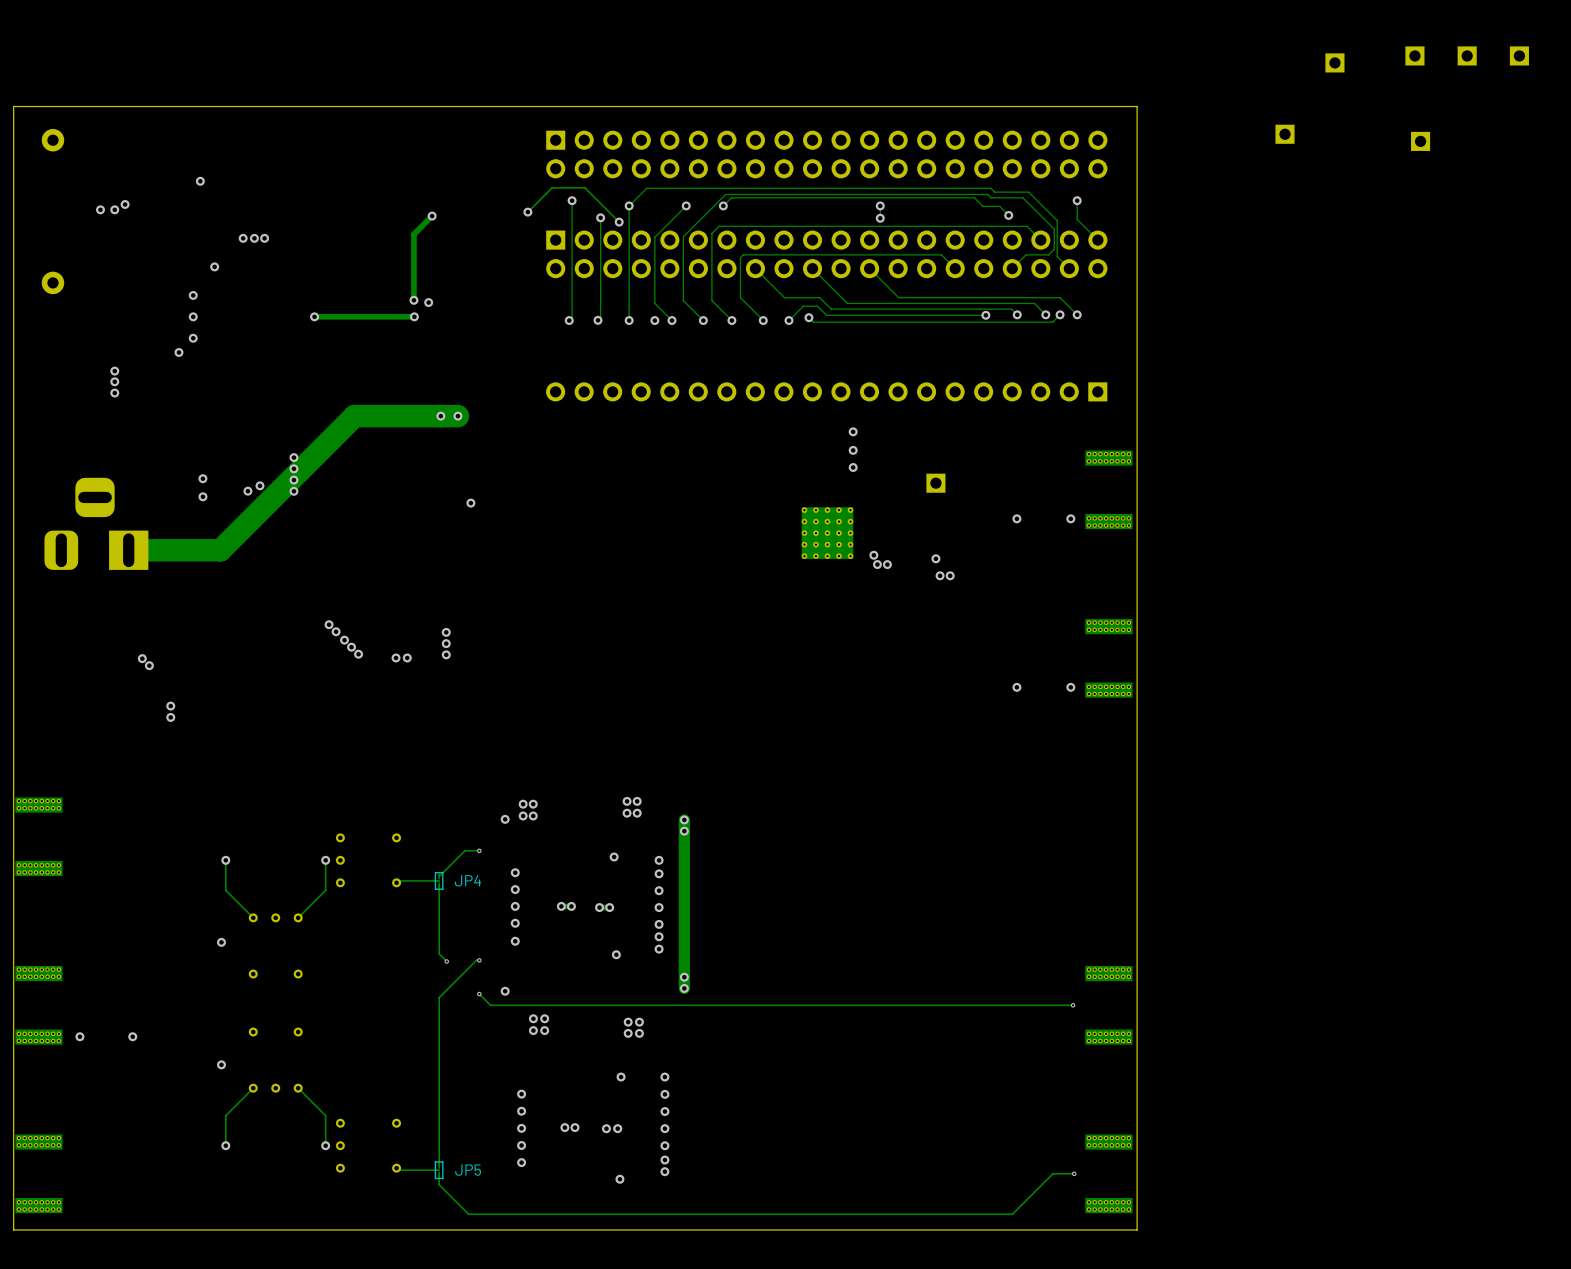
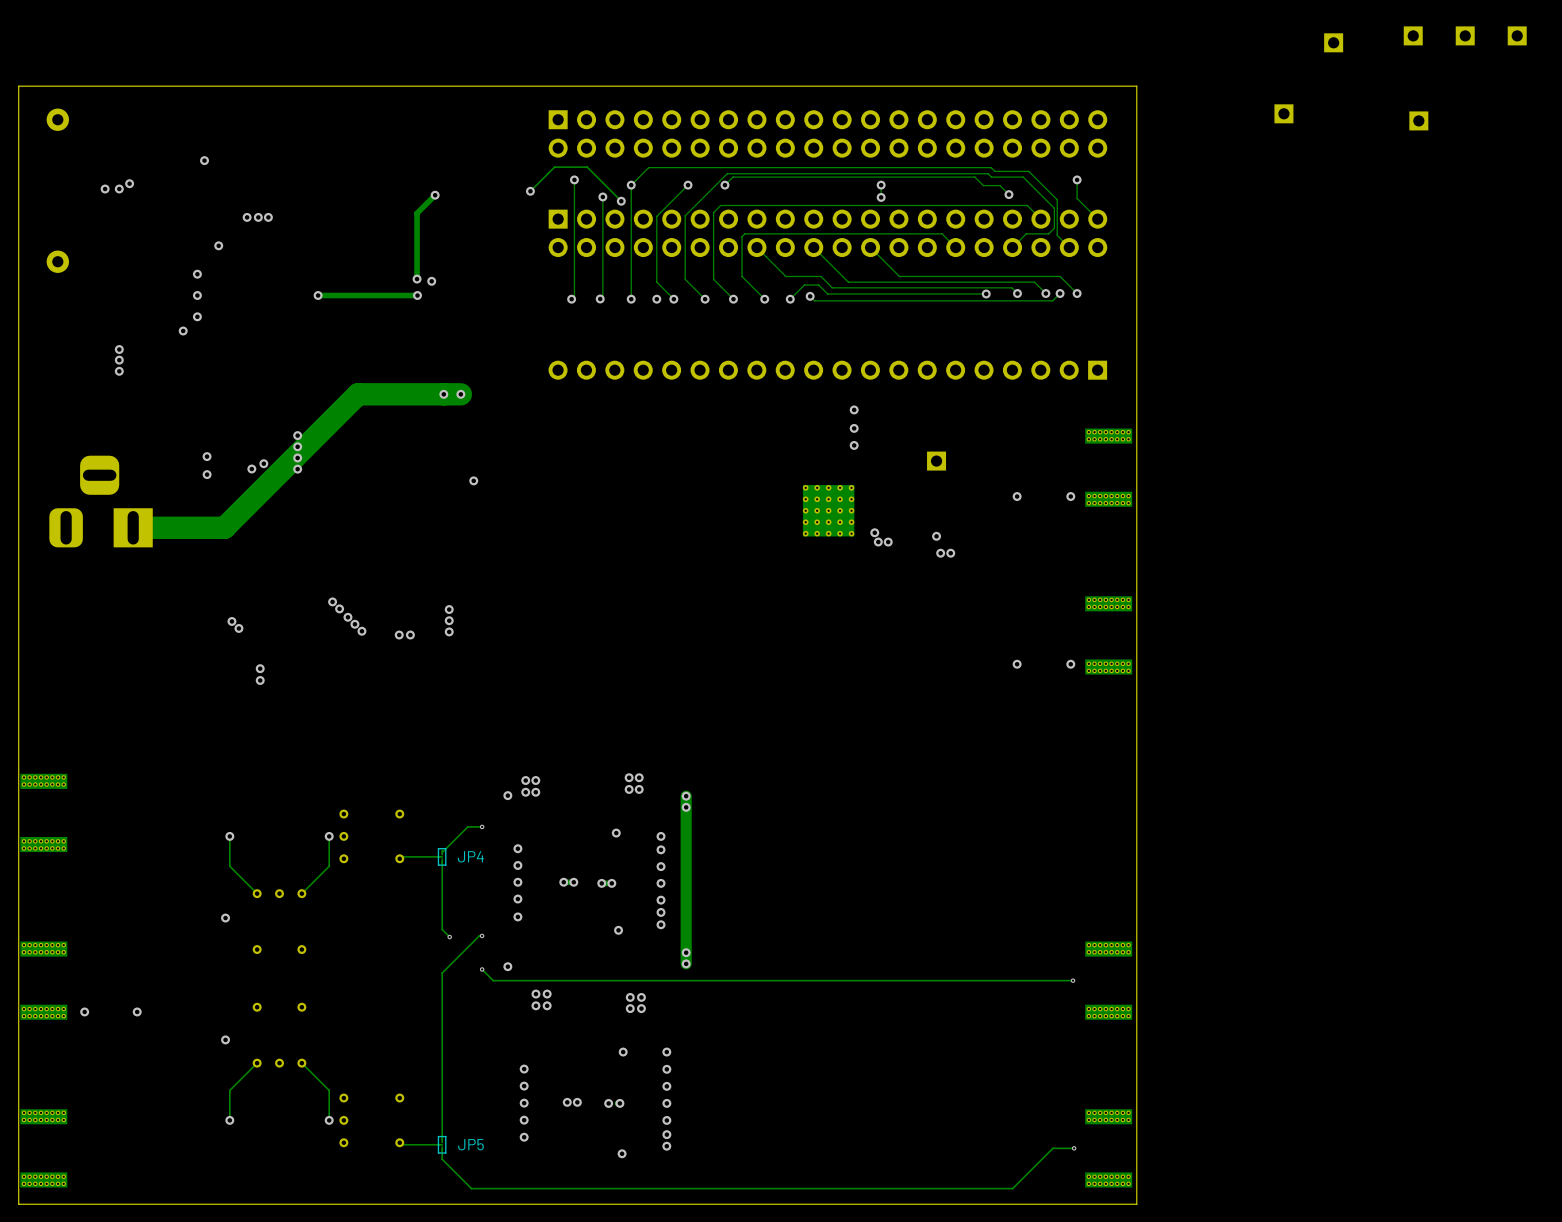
via: none -> (231, 621)
via: none -> (238, 628)
via: (142, 658) -> none
via: (149, 665) -> none
via: none -> (260, 668)
via: none -> (260, 680)
via: (170, 706) -> none
via: (170, 717) -> none

